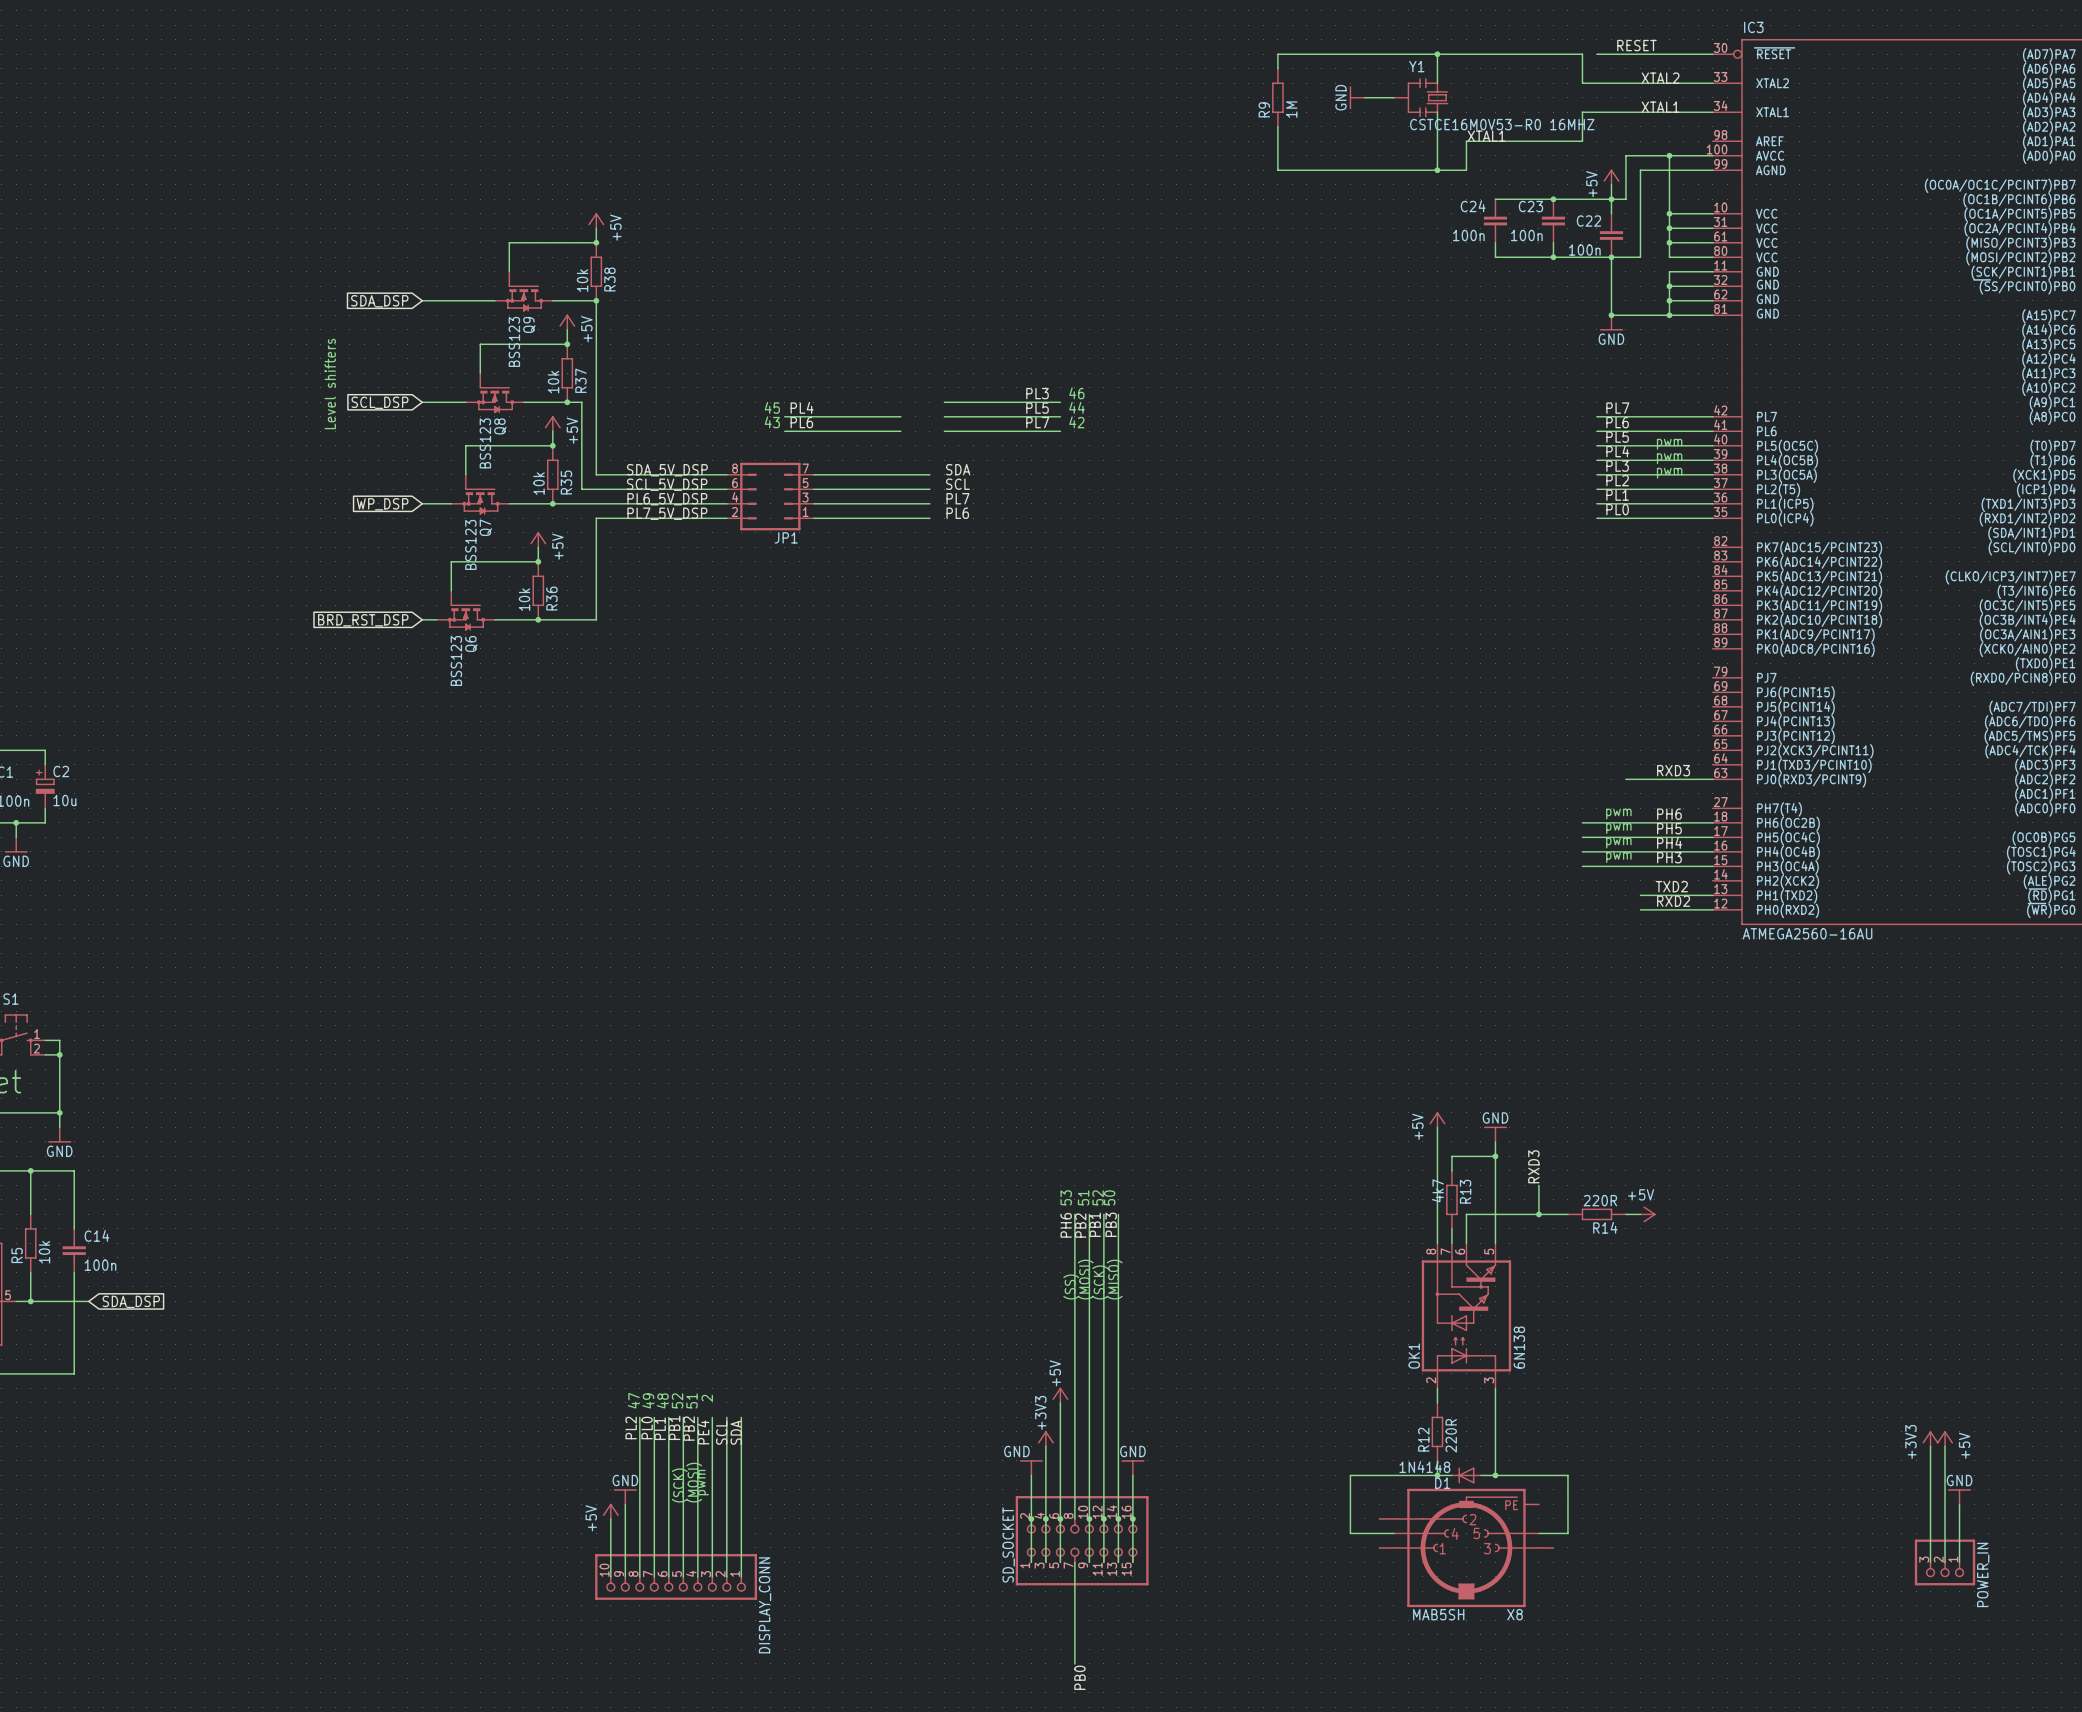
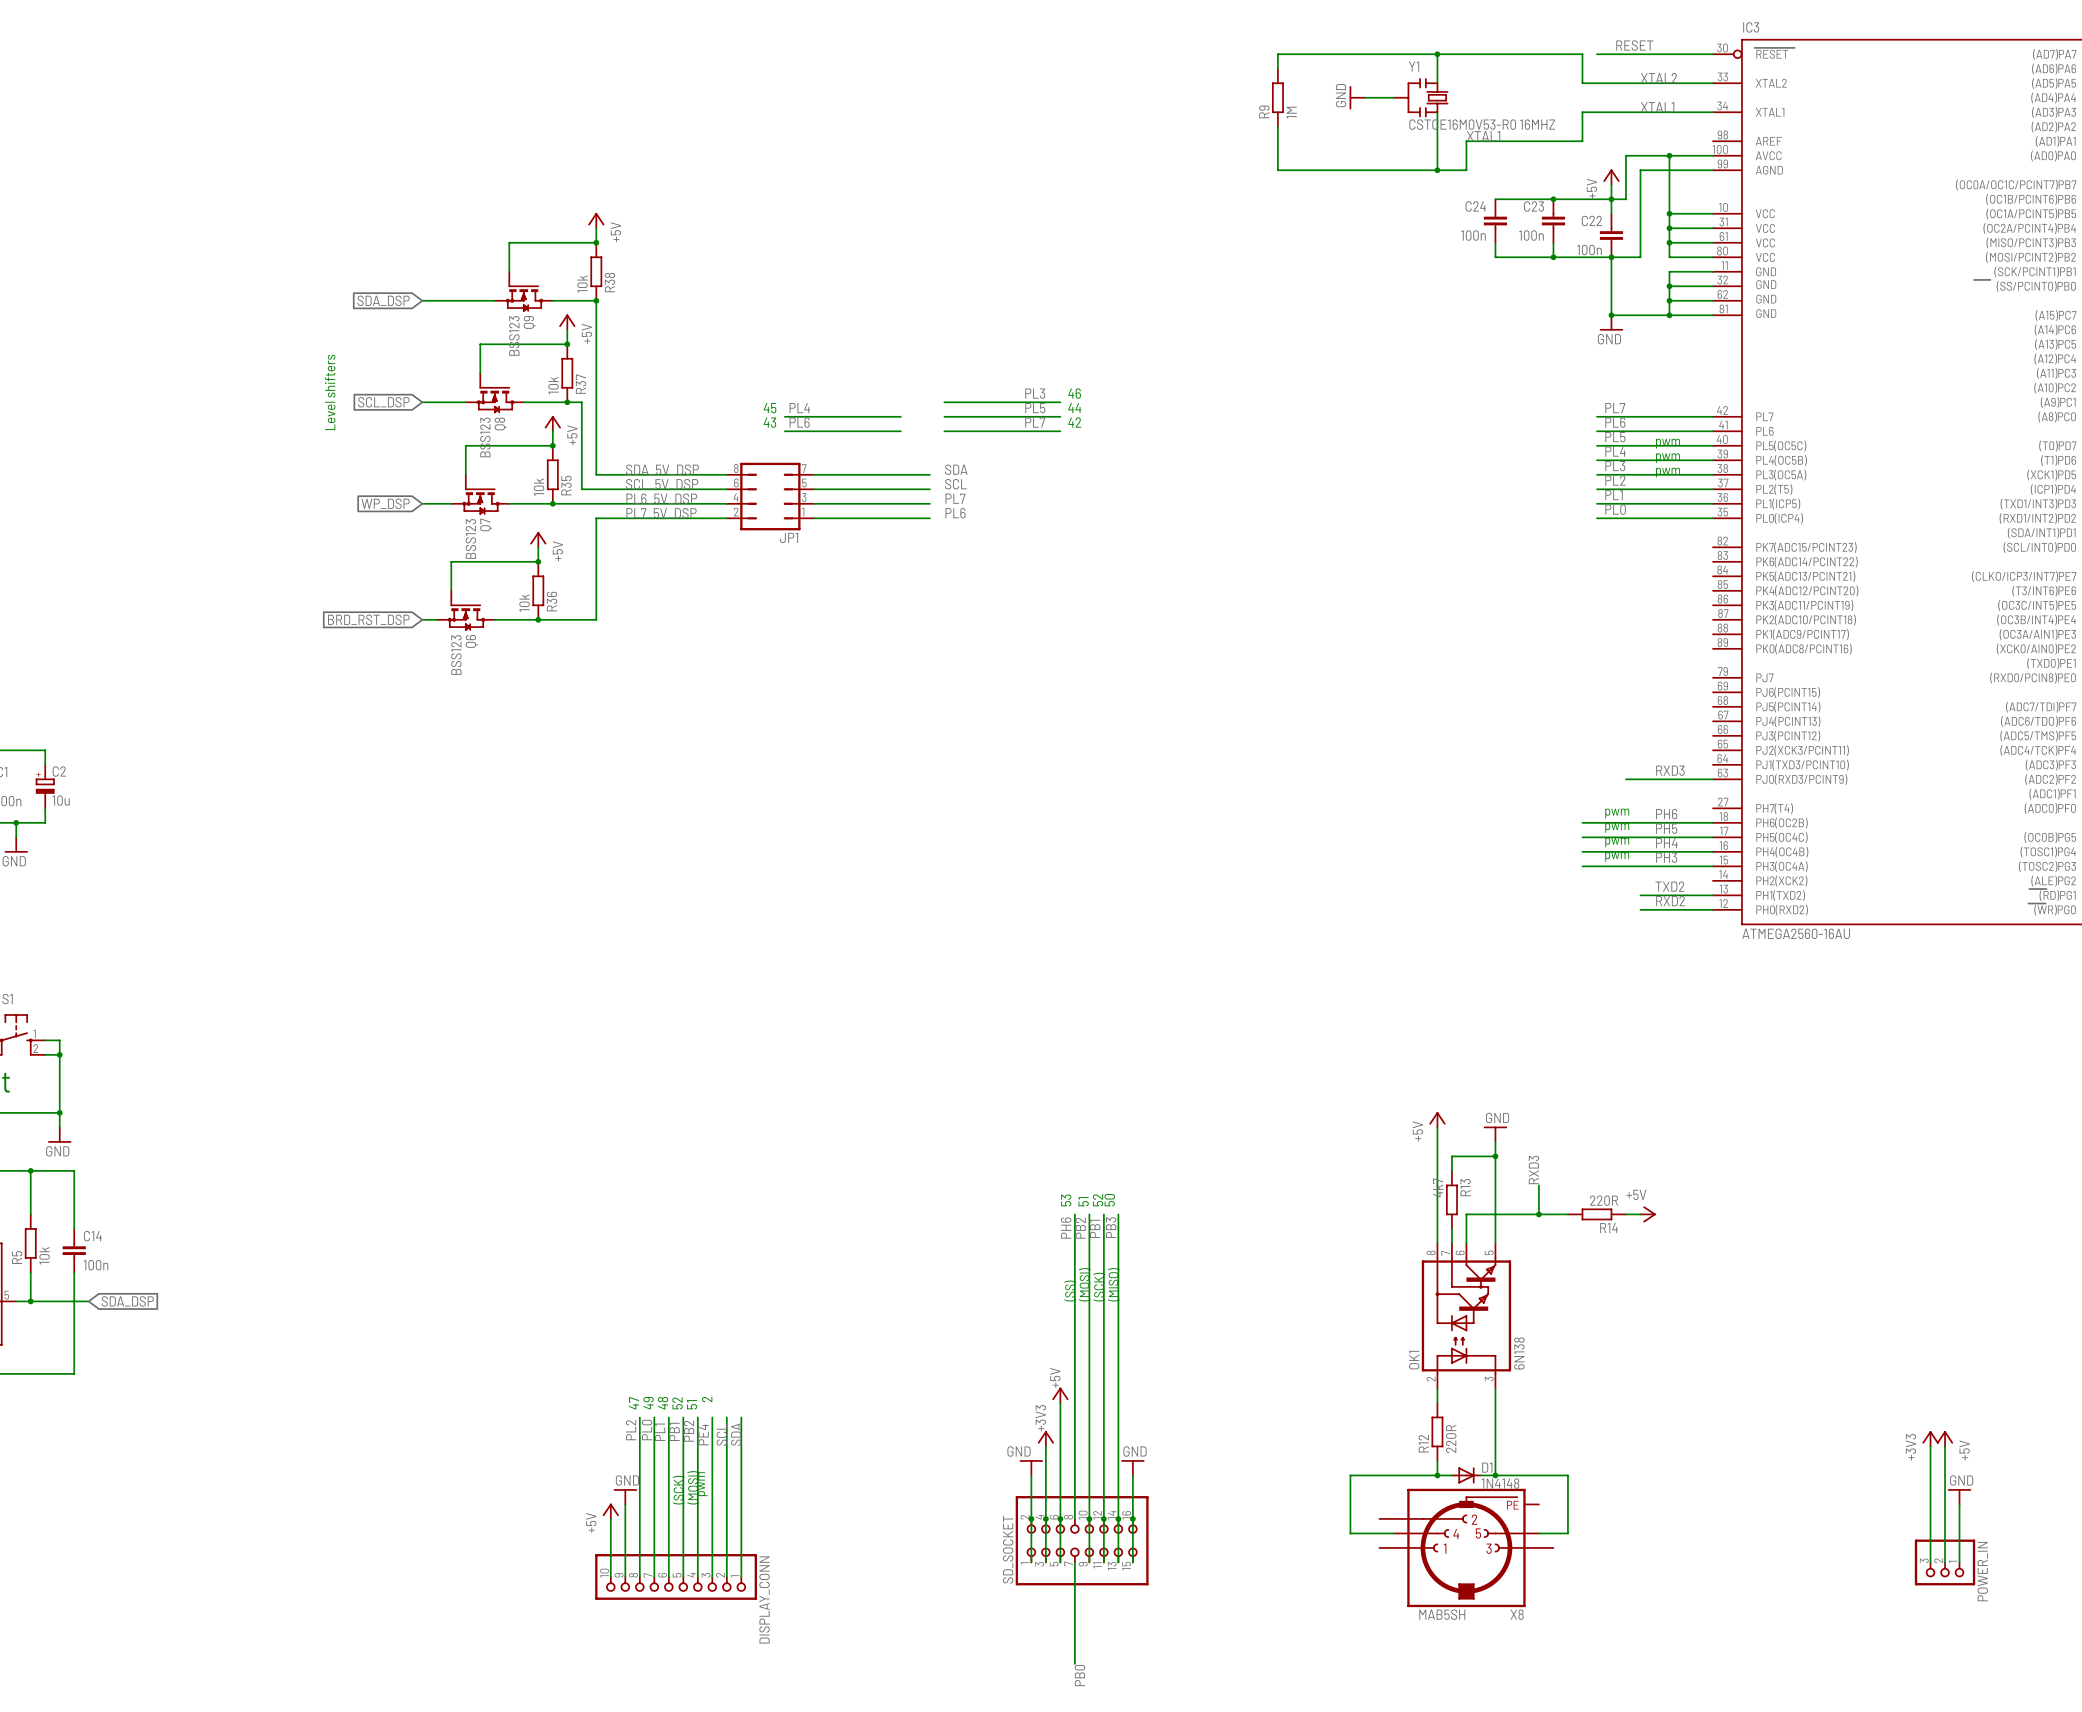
D1 rotation: 0° (1466, 1475) -> 180° (1466, 1475)

